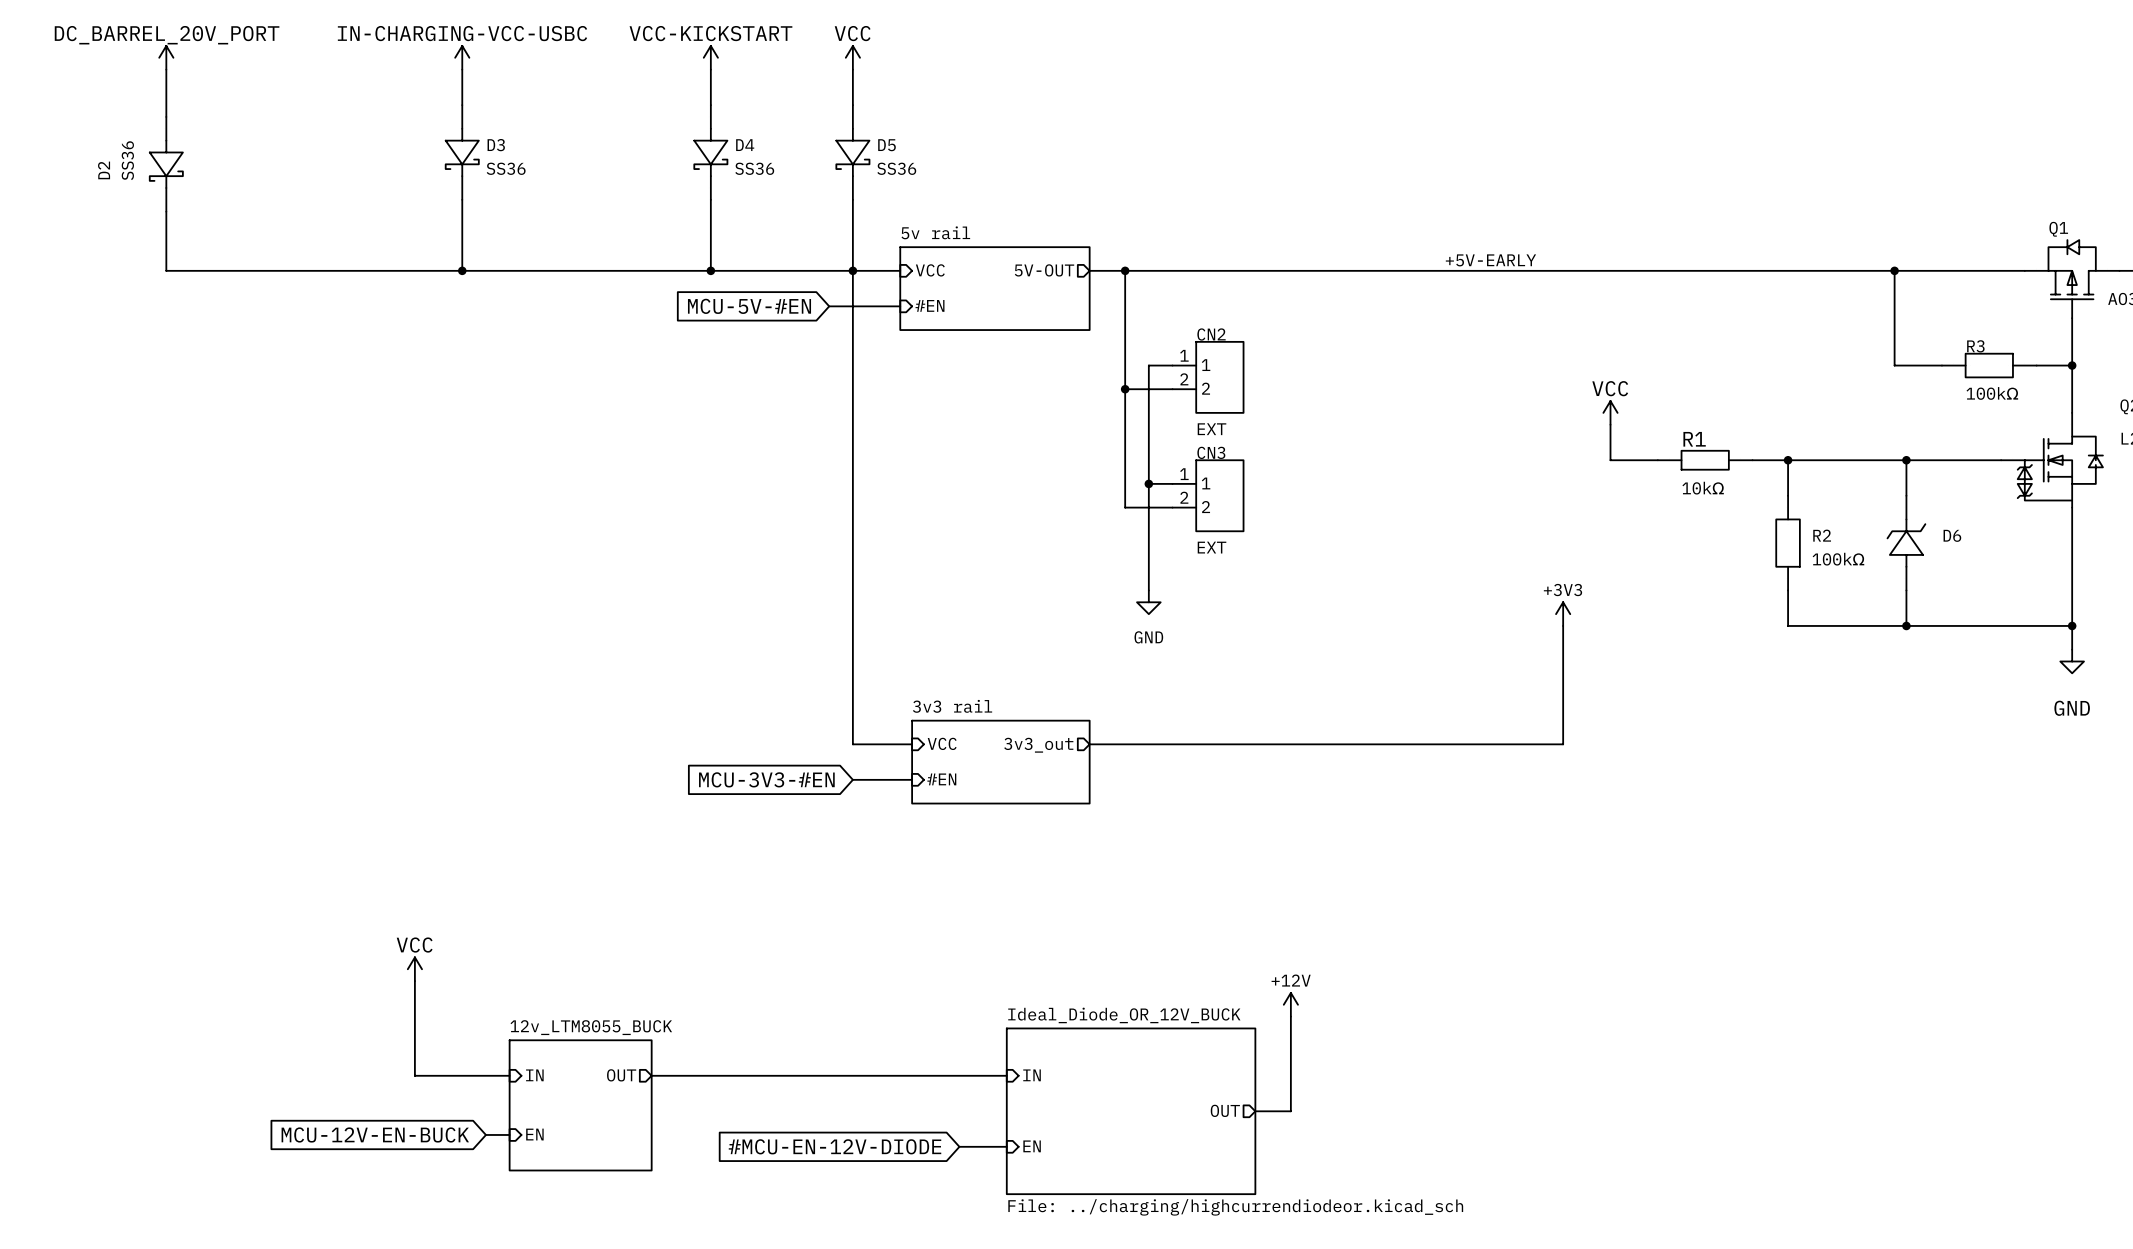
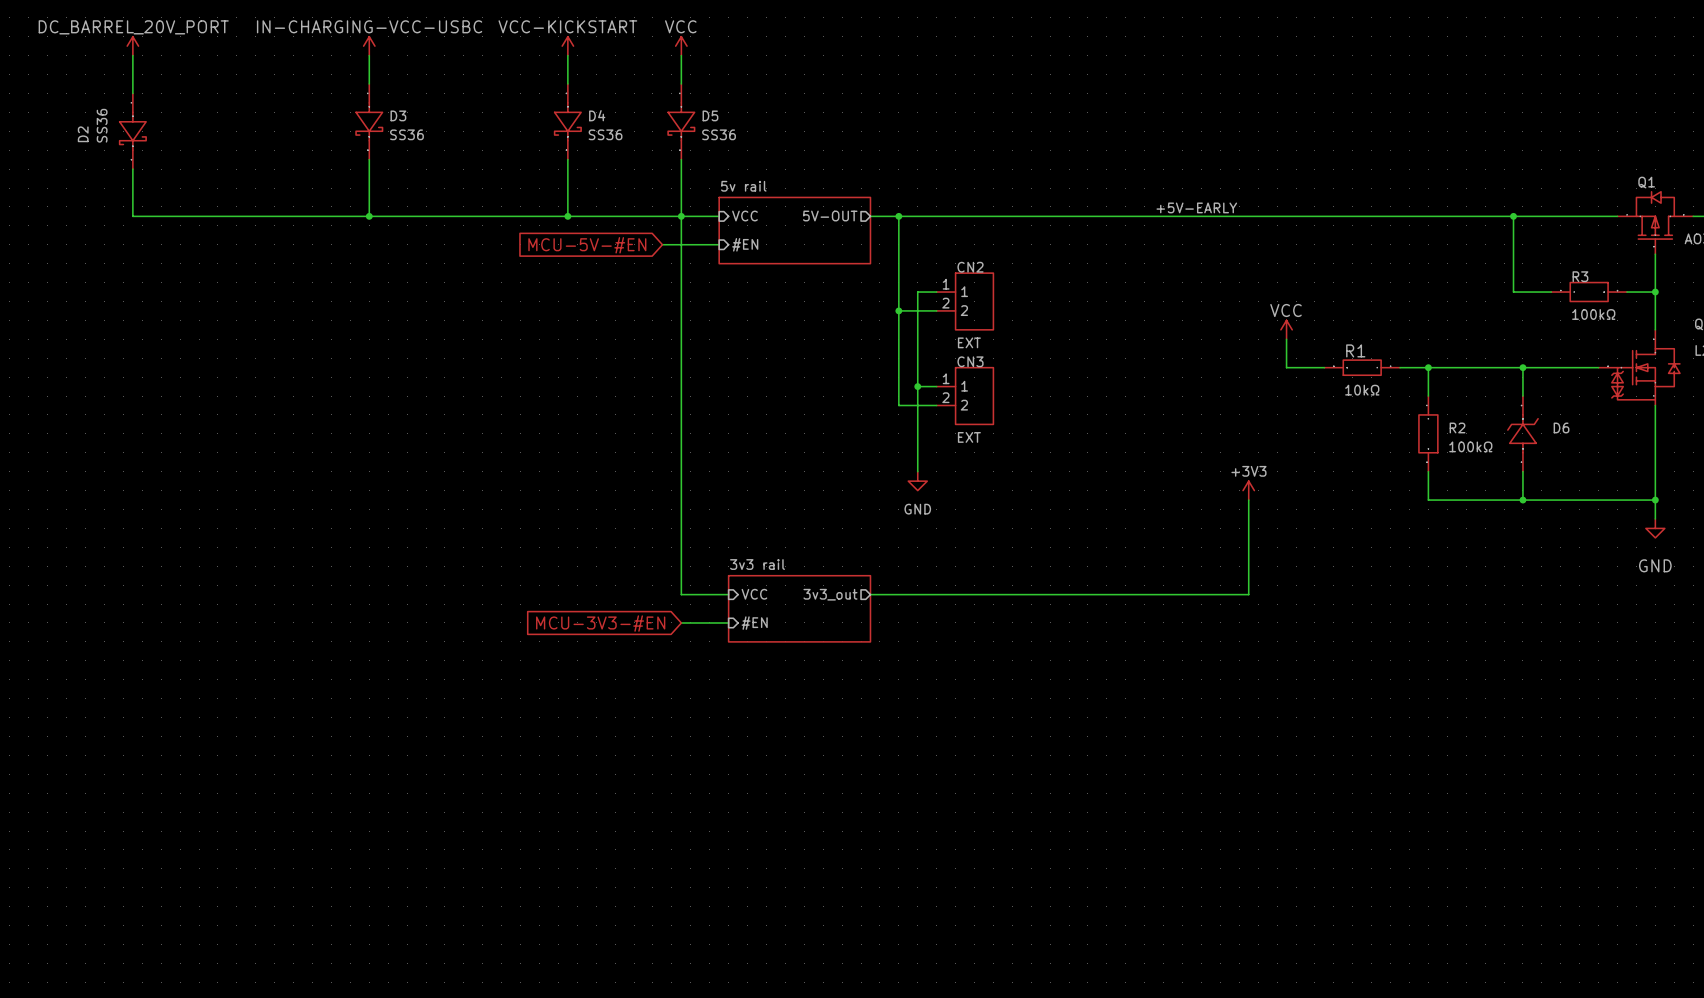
power symbol: VCC (414, 969) -> none
wire: (414, 981) (414, 1075) (509, 1075) -> none
power symbol: +12V (1290, 1004) -> none
wire: (1290, 1016) (1290, 1111) (1255, 1111) -> none
sheet pin: IN (534, 1075) -> none
sheet pin: OUT (621, 1075) -> none
wire: (651, 1075) (1006, 1075) -> none
sheet pin: IN (1032, 1075) -> none
sheet 12v_LTM8055_BUCK: (580, 1105) -> none
sheet pin: OUT (1225, 1110) -> none
sheet Ideal_Diode_OR_12V_BUCK: File: ../charging/highcurrendiodeor.kicad_sch (1131, 1111) -> none
global label: MCU-12V-EN-BUCK (375, 1134) -> none
wire: (485, 1134) (509, 1134) -> none
sheet pin: EN (534, 1134) -> none
global label: #MCU-EN-12V-DIODE (835, 1146) -> none
wire: (959, 1146) (1006, 1146) -> none
sheet pin: EN (1032, 1146) -> none

